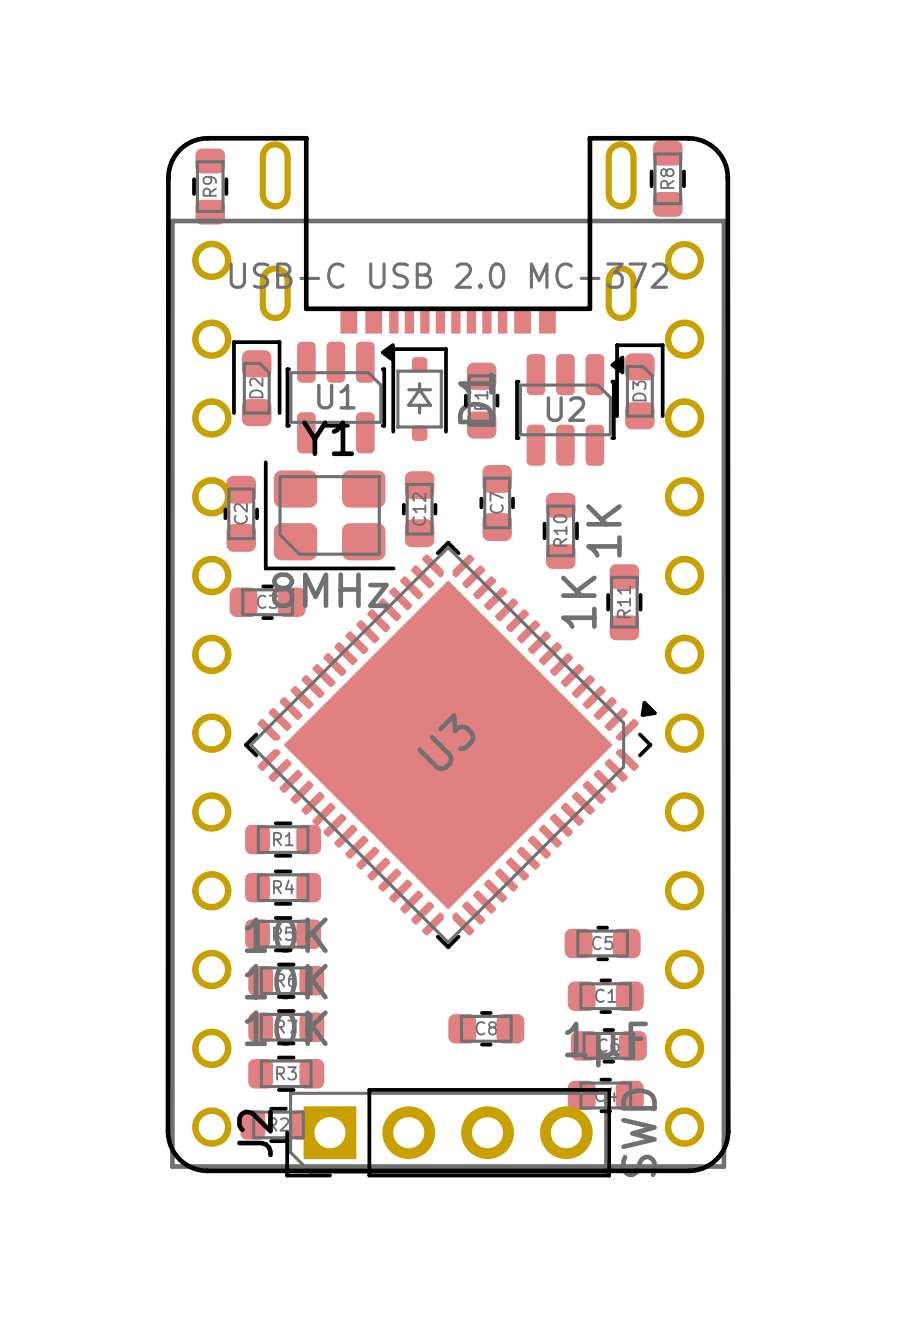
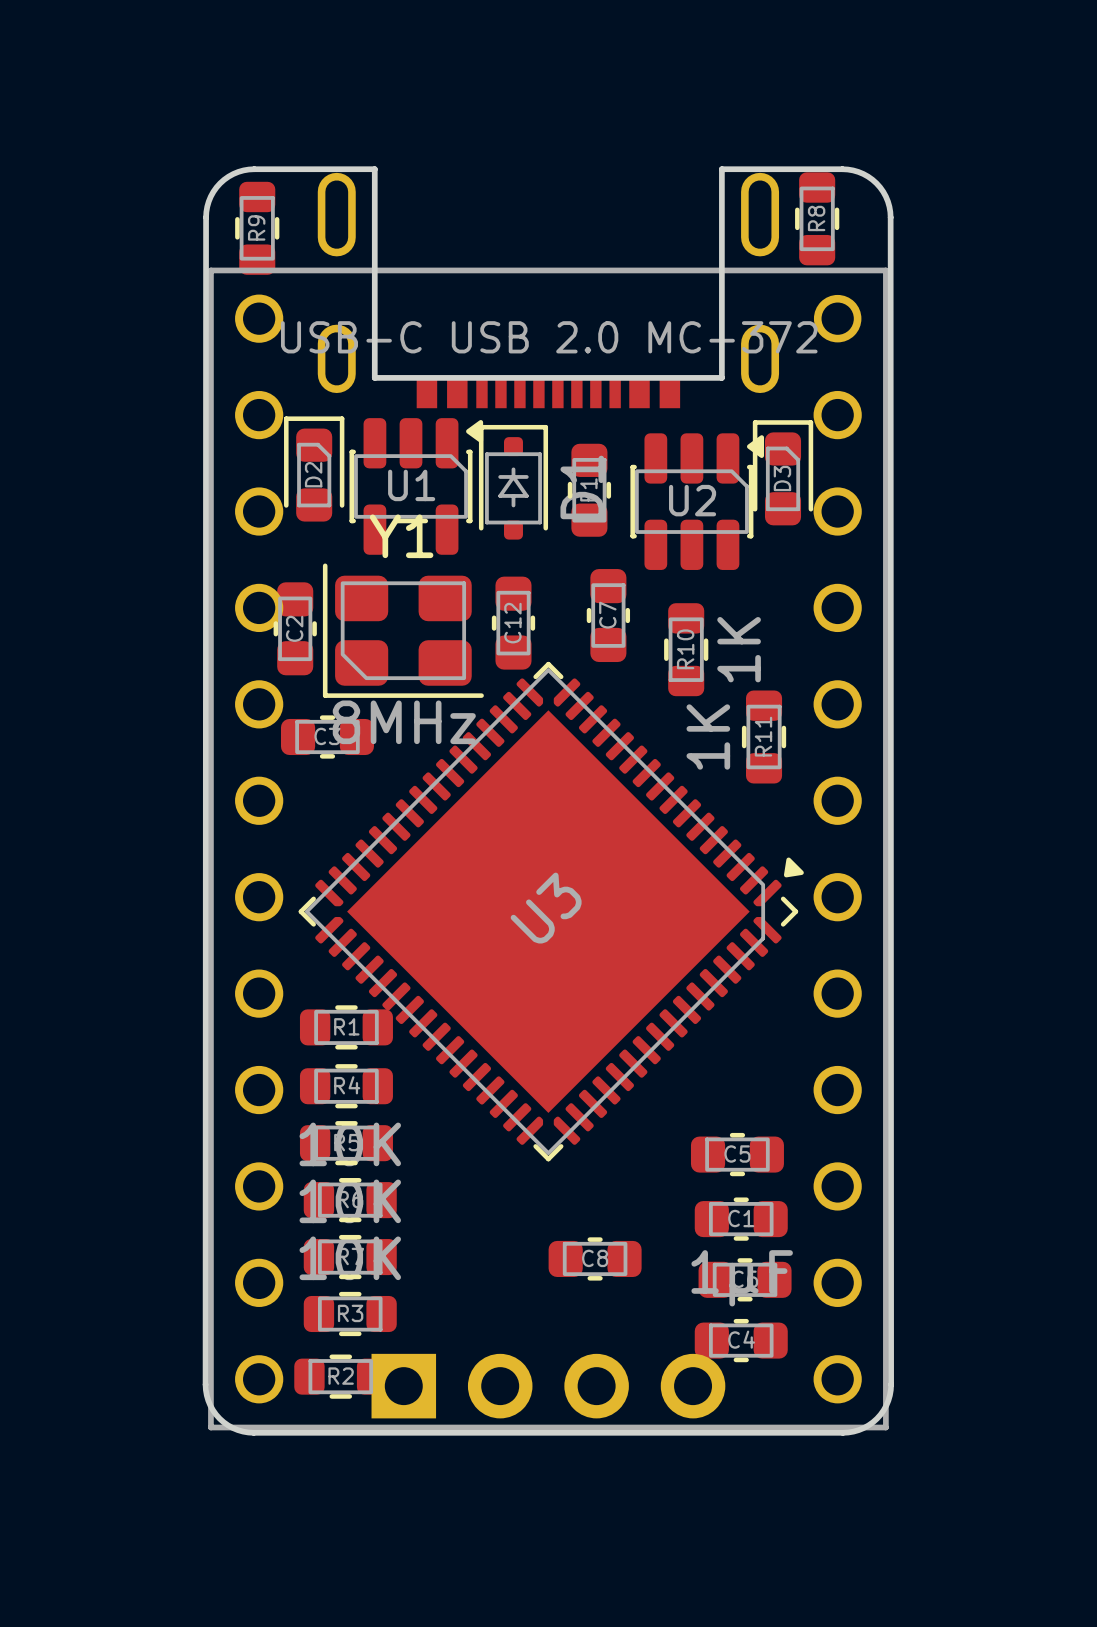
J2 side: top (448, 1132) -> bottom (548, 1386)

